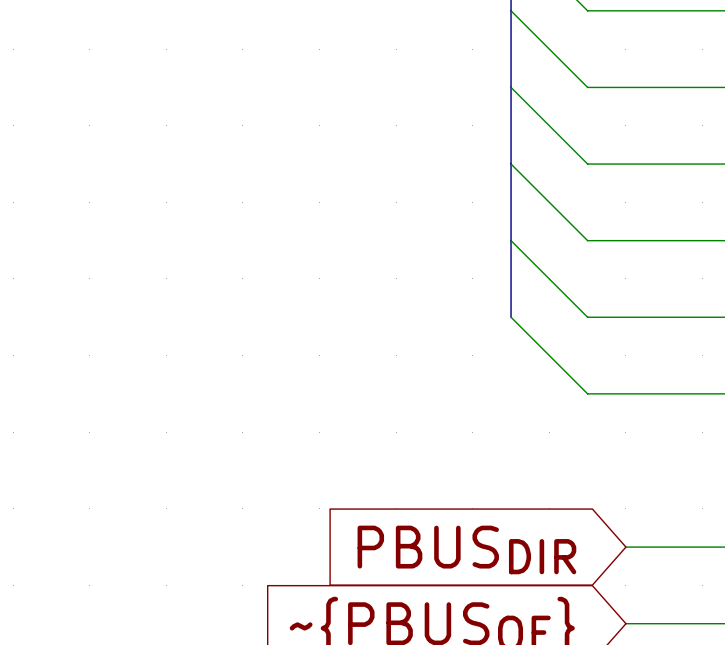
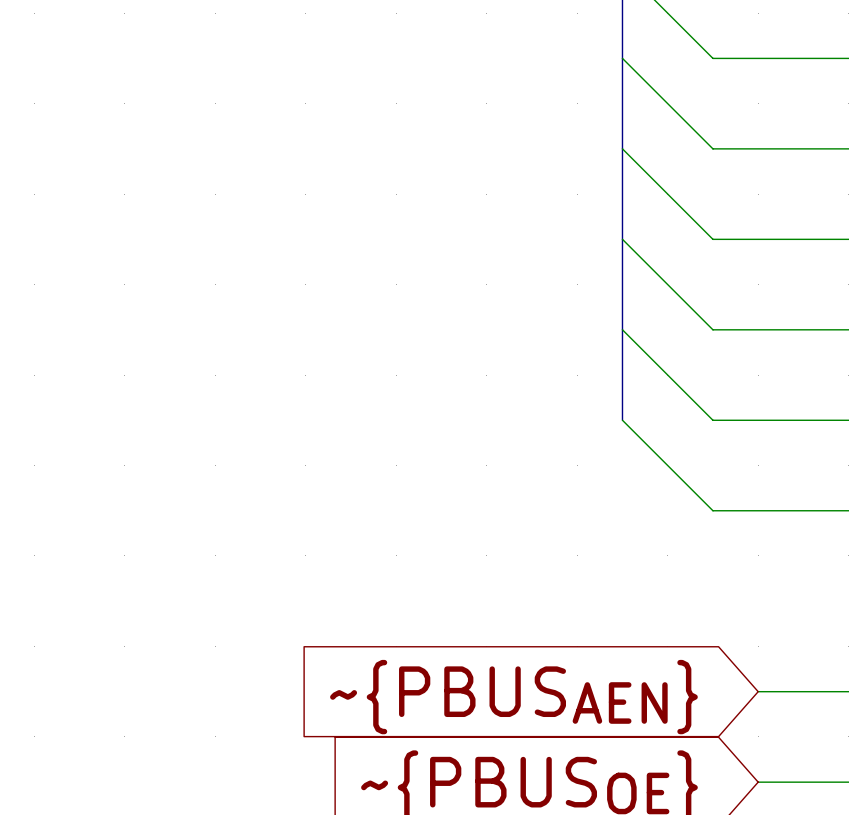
global label: PBUSDIR (466, 549) -> ~{PBUSAEN} (513, 697)

